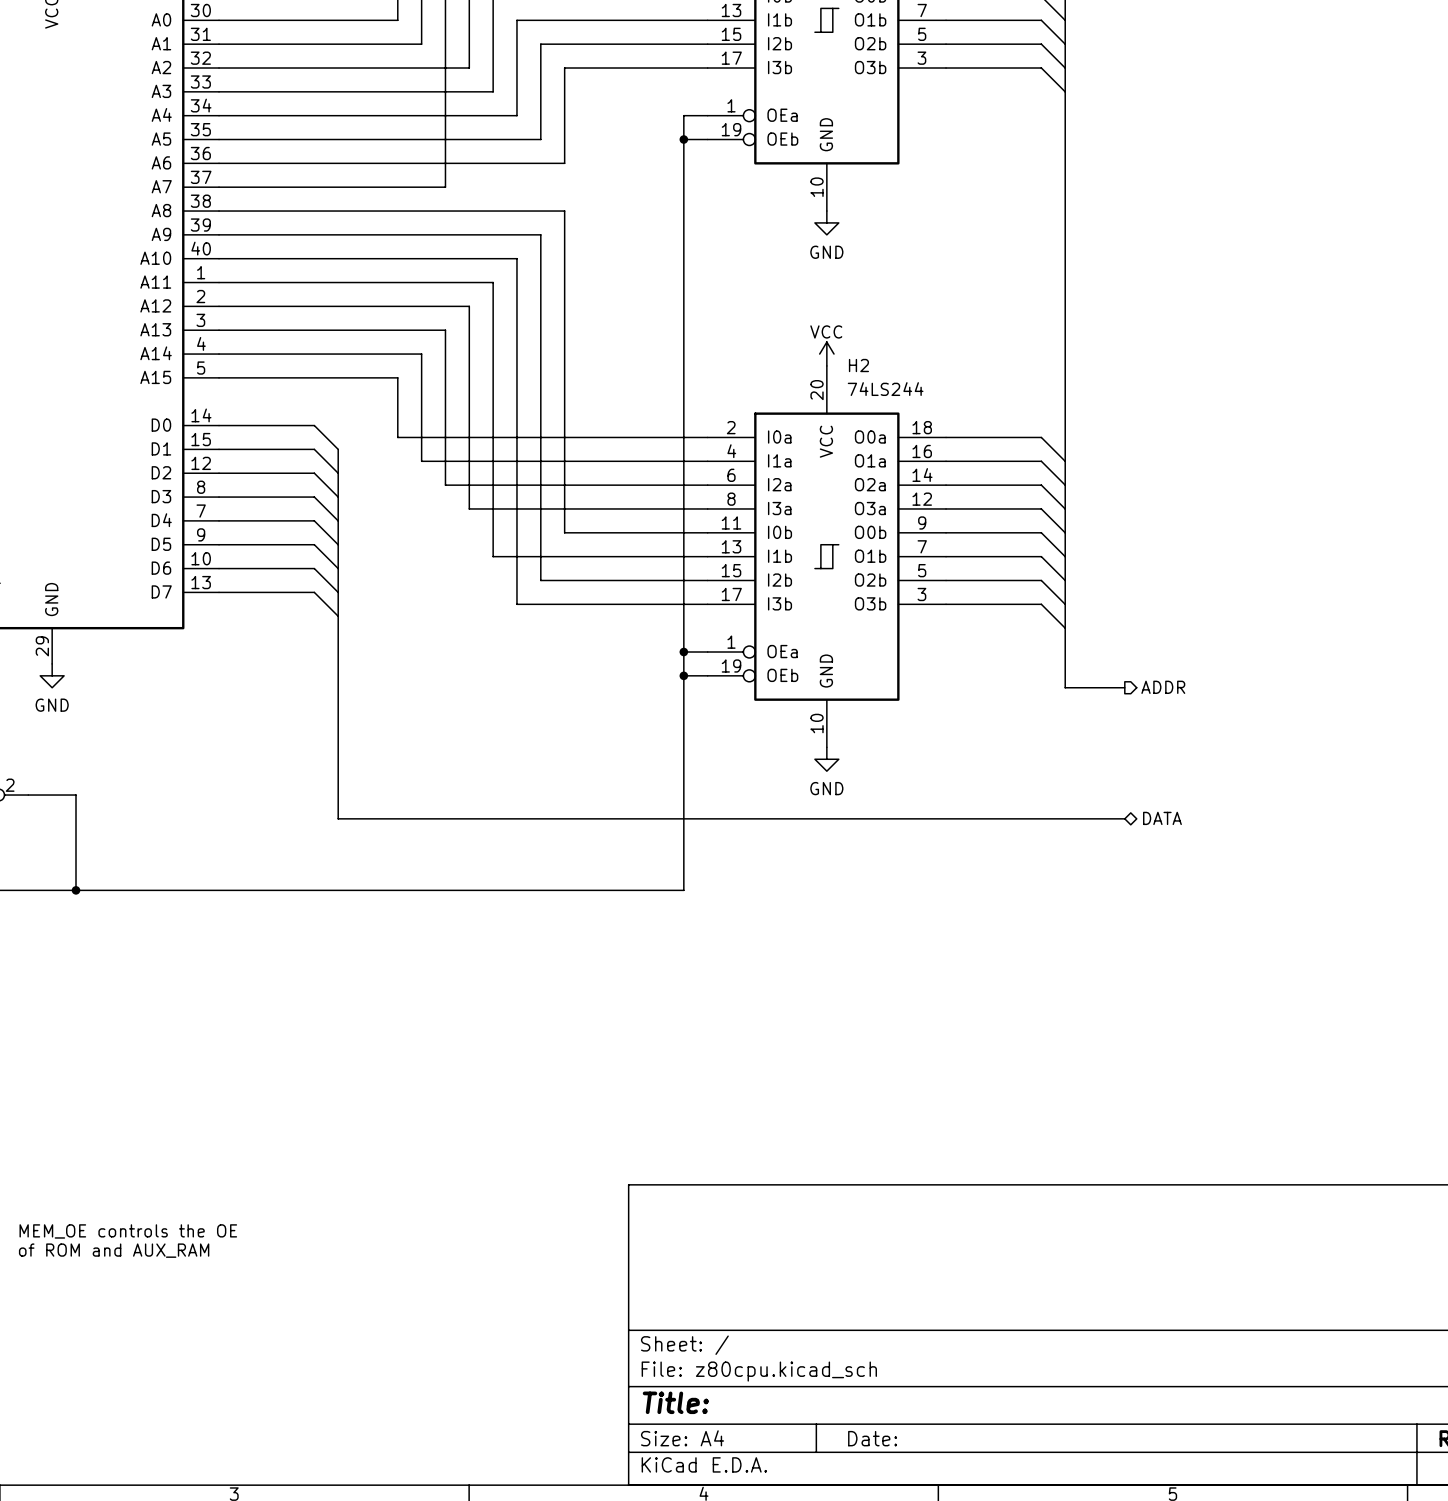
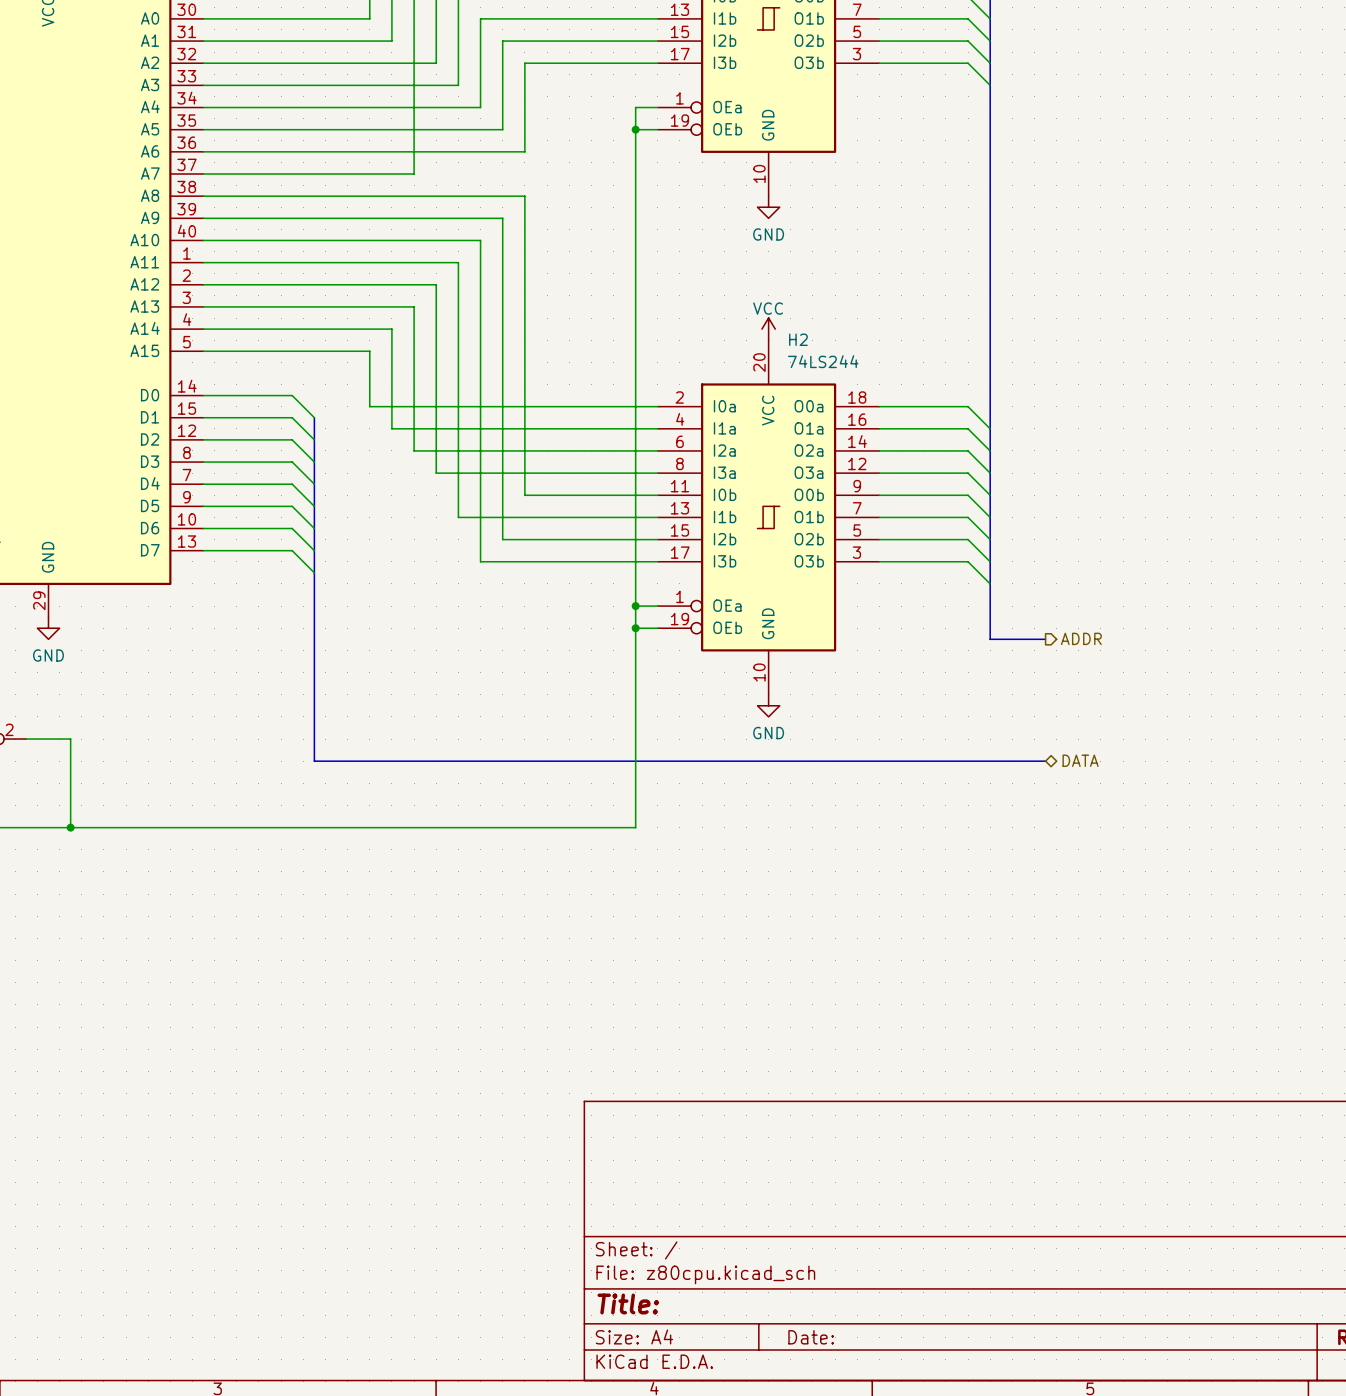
text: MEM_OE controls the OE (128, 1231) -> none
text: of ROM and AUX_RAM (114, 1250) -> none

